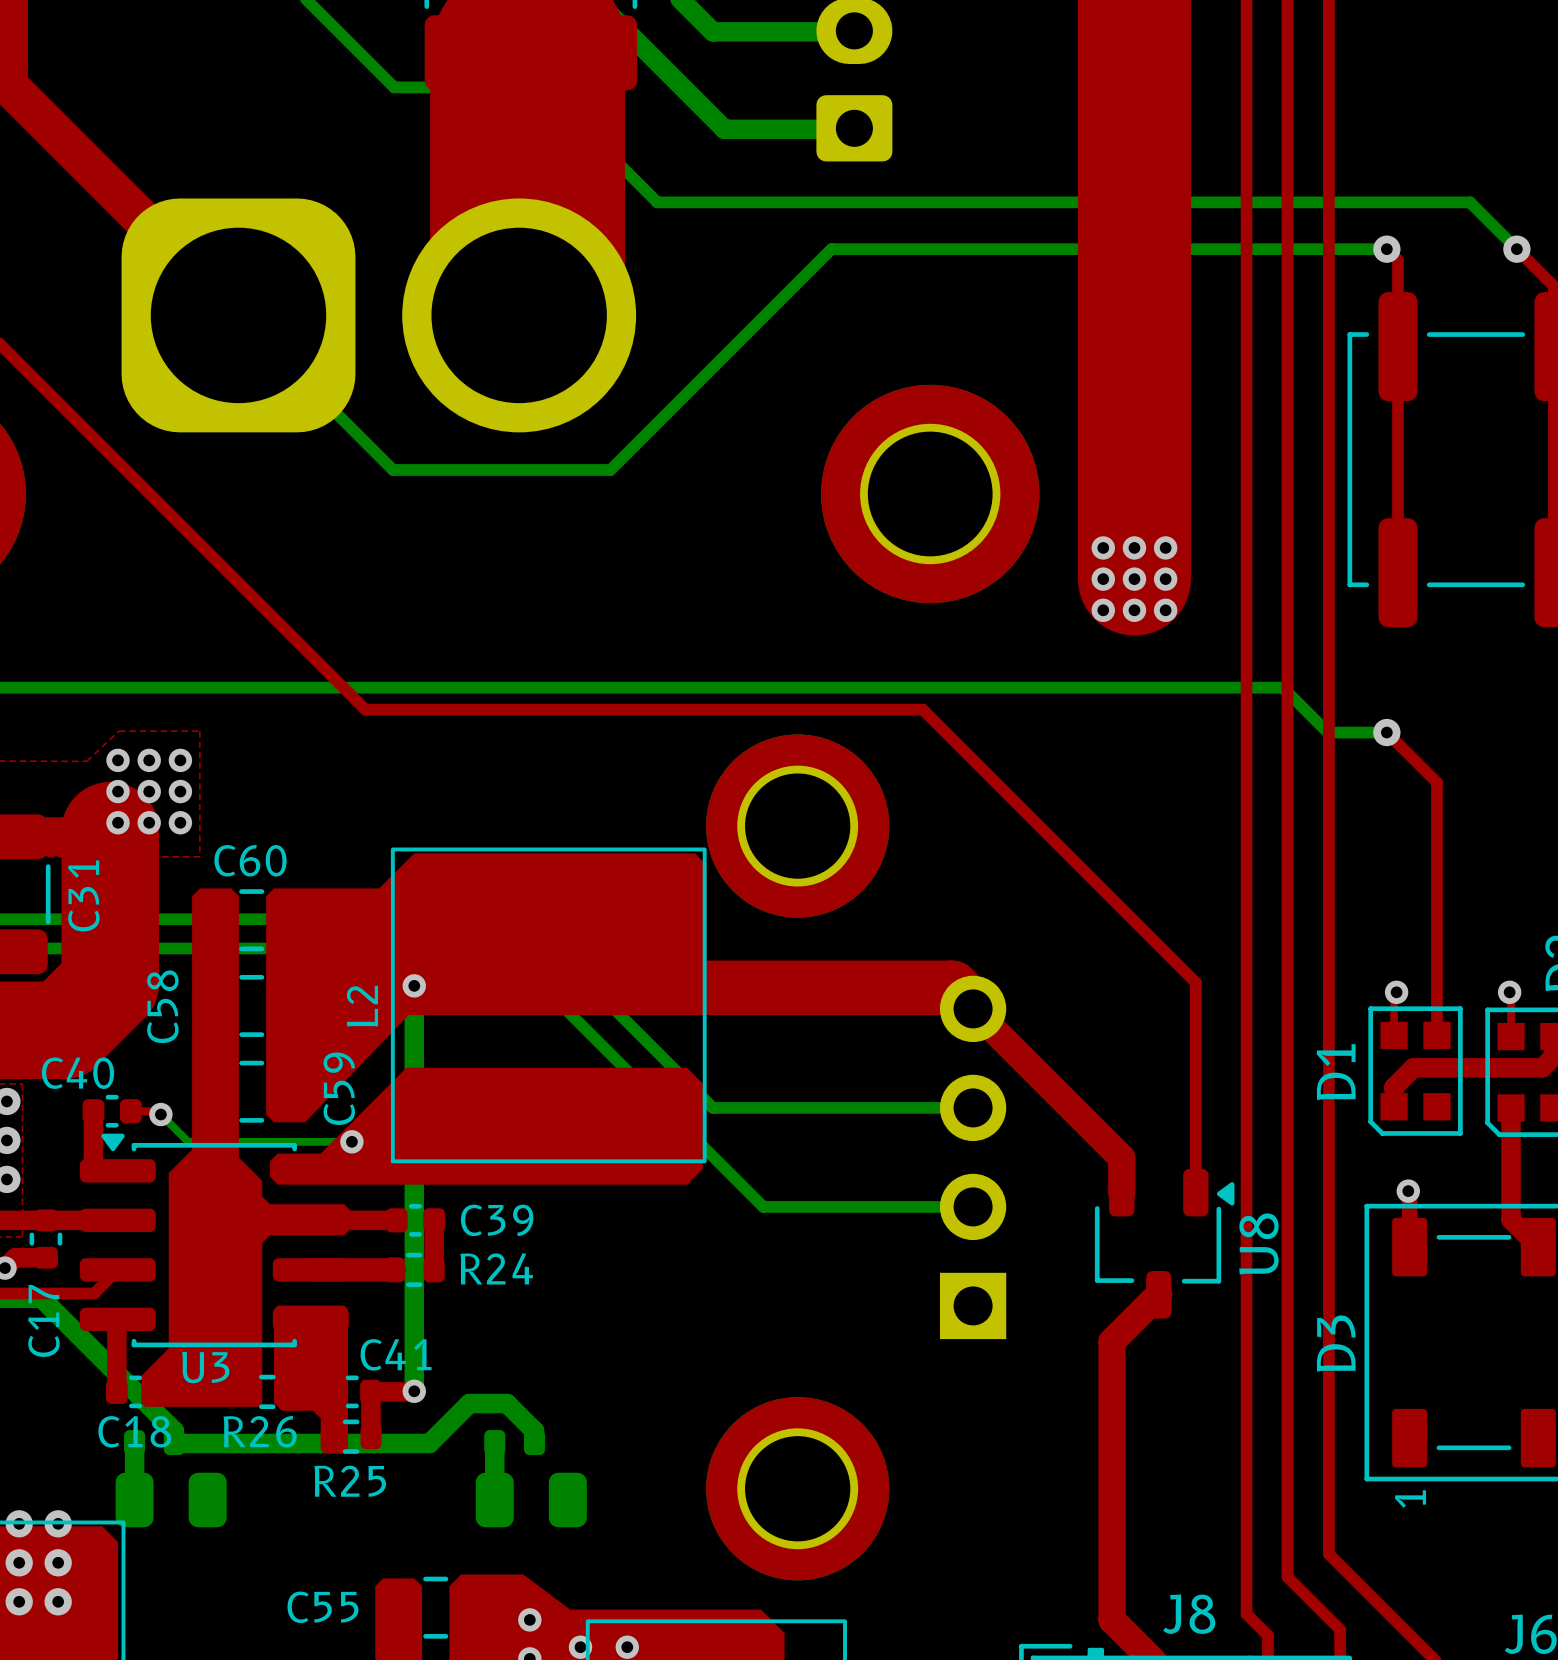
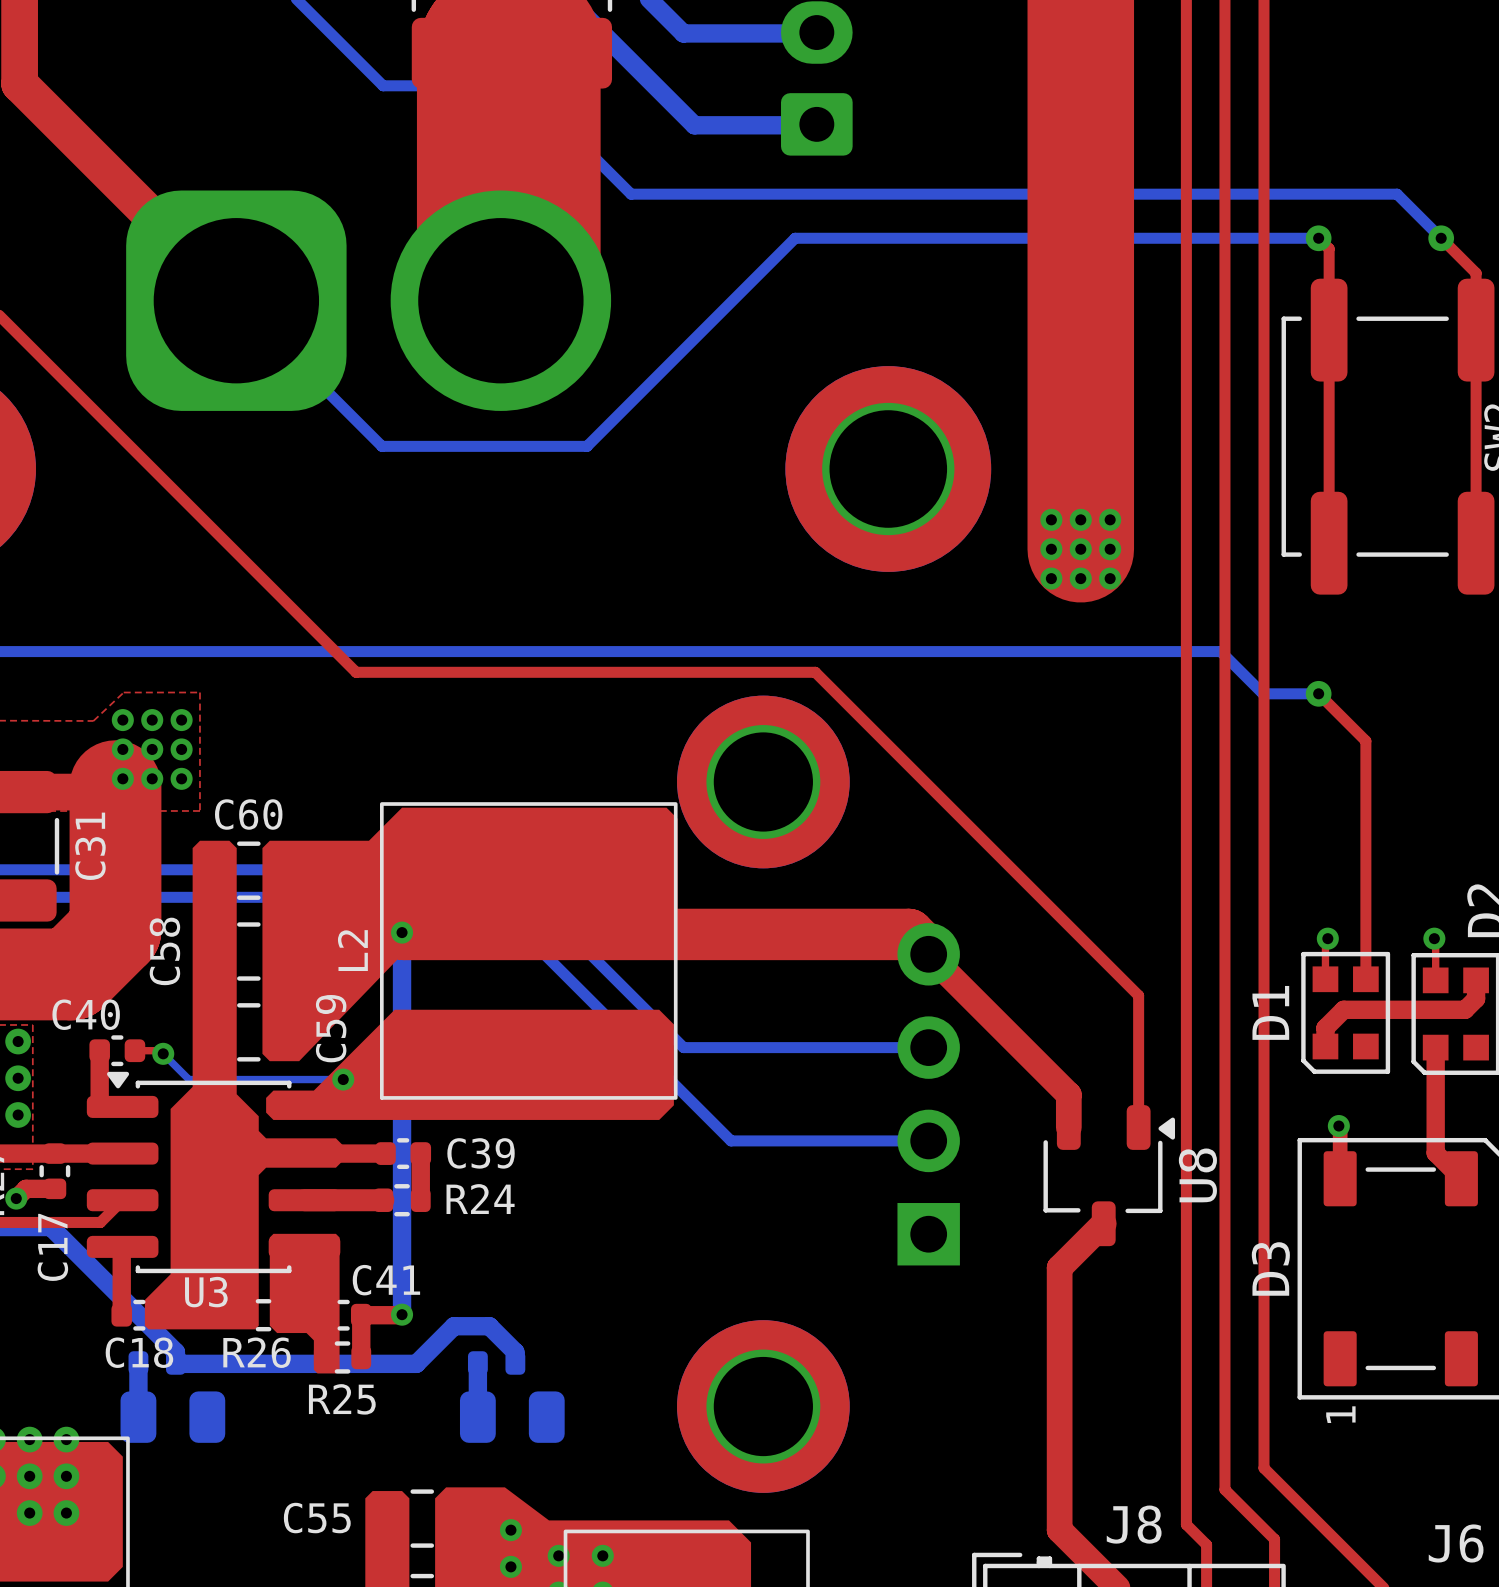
top track: (852, 709) (922, 709) (1195, 982) (1195, 1052) -> (815, 672) (1138, 995)

